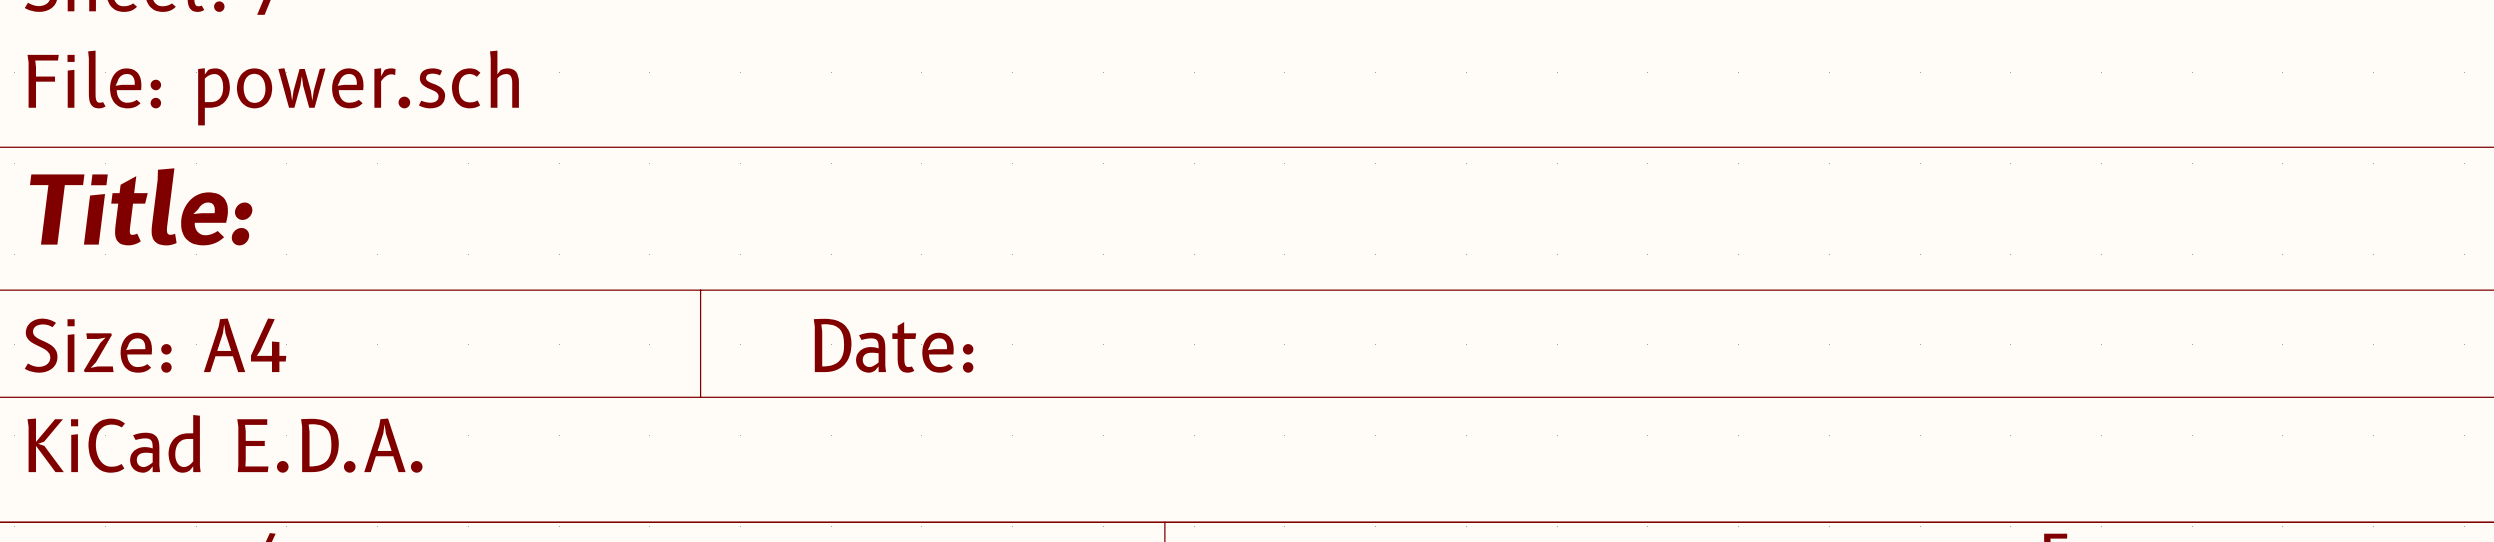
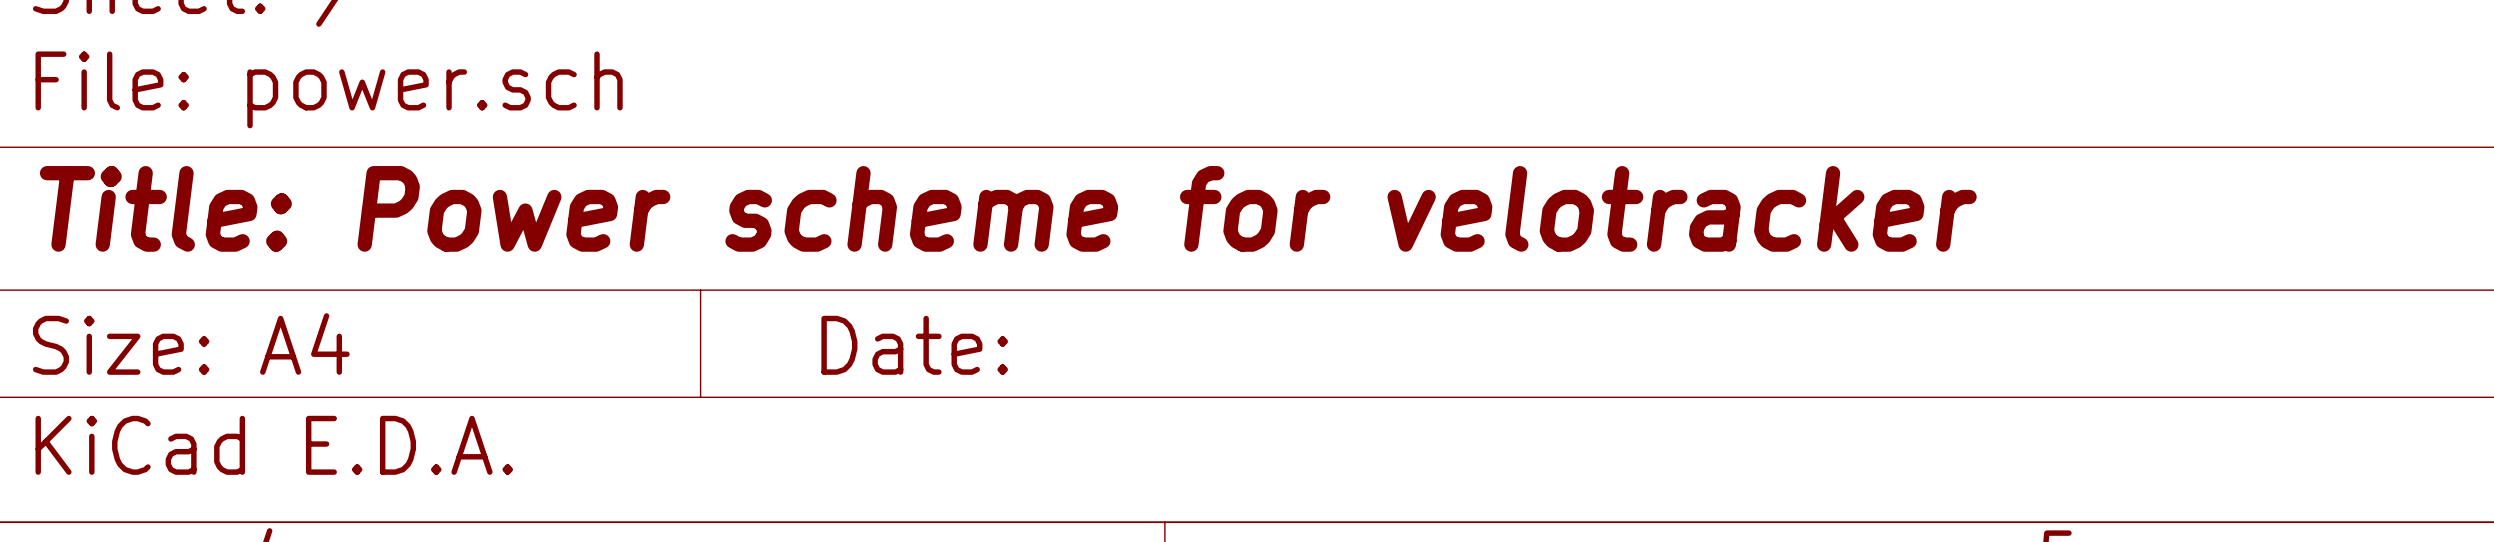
title block: Title: (141, 206) -> Title: Power scheme for velotracker (1008, 208)

